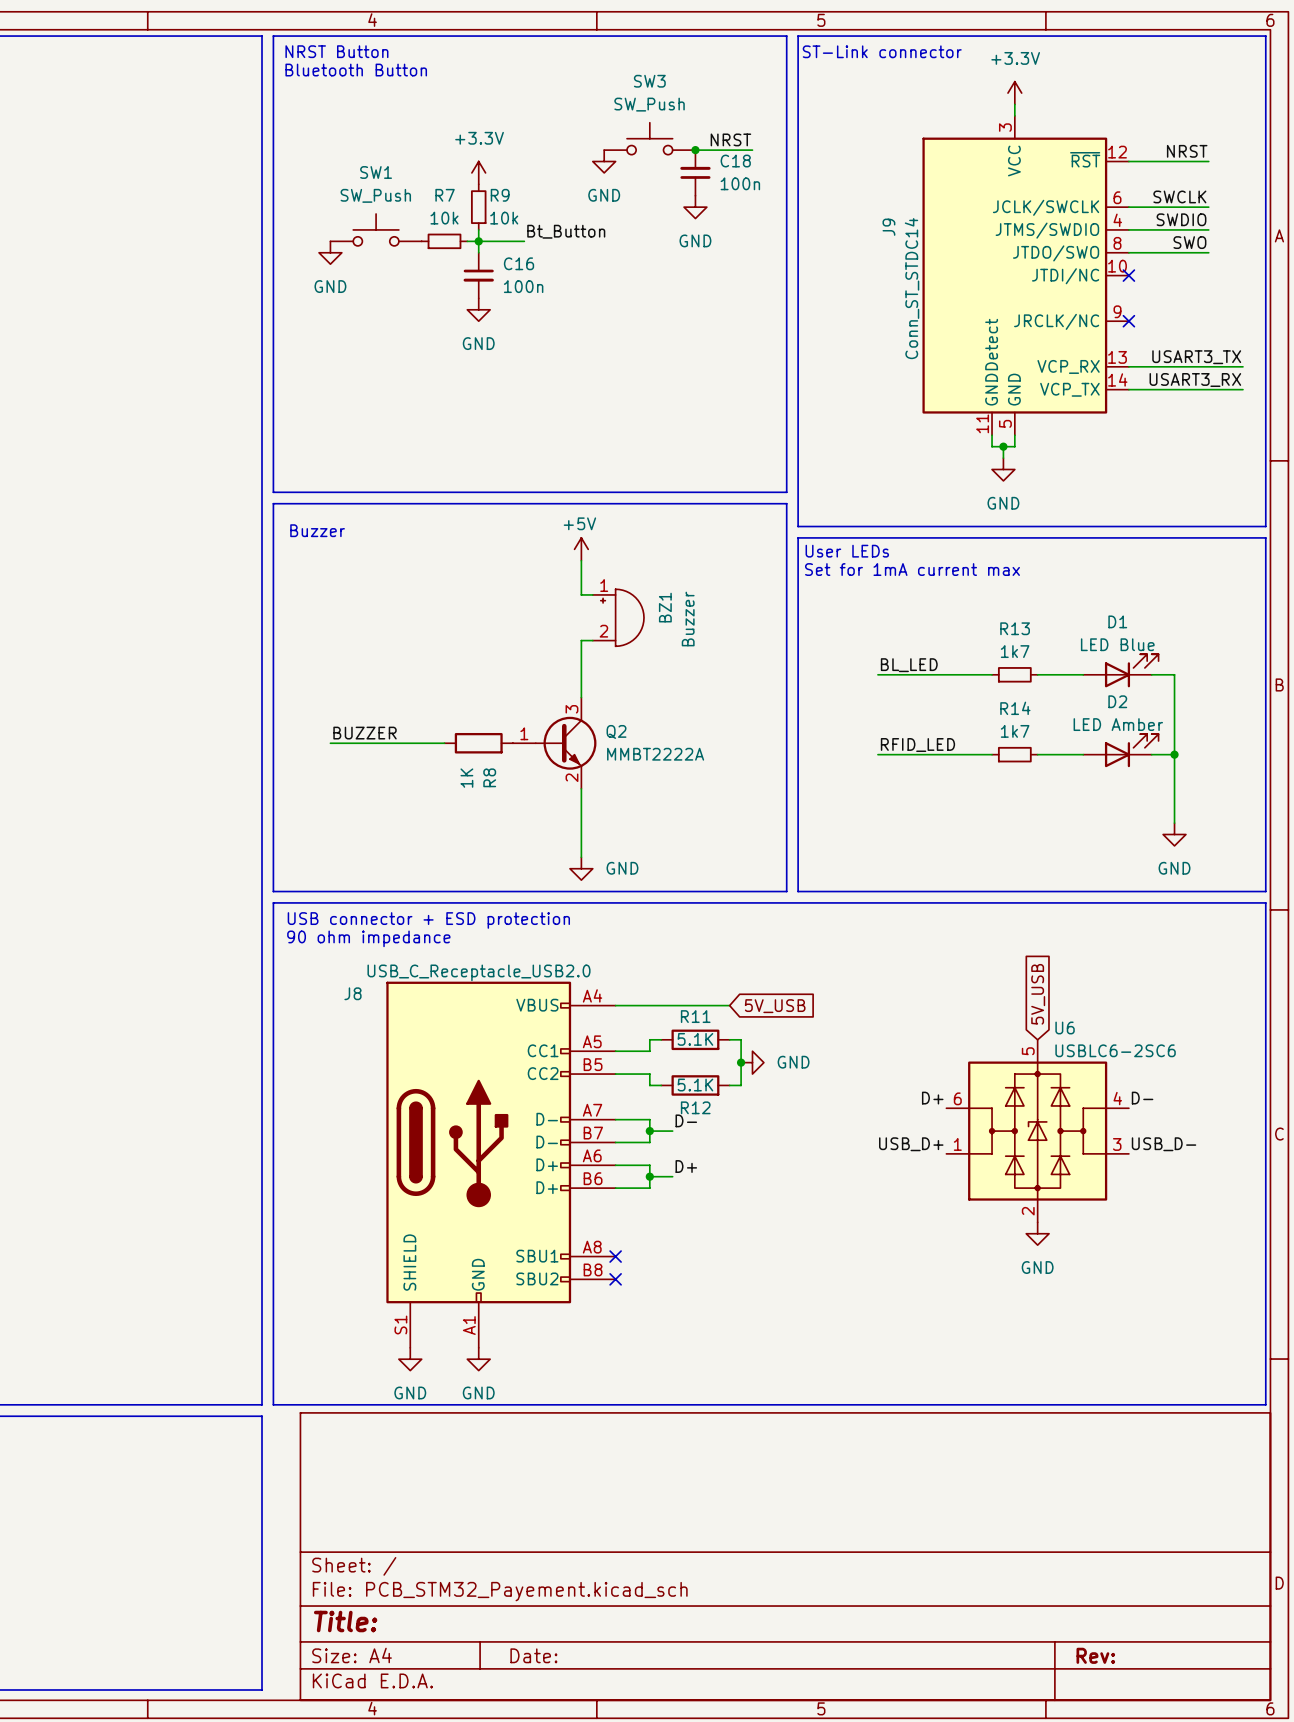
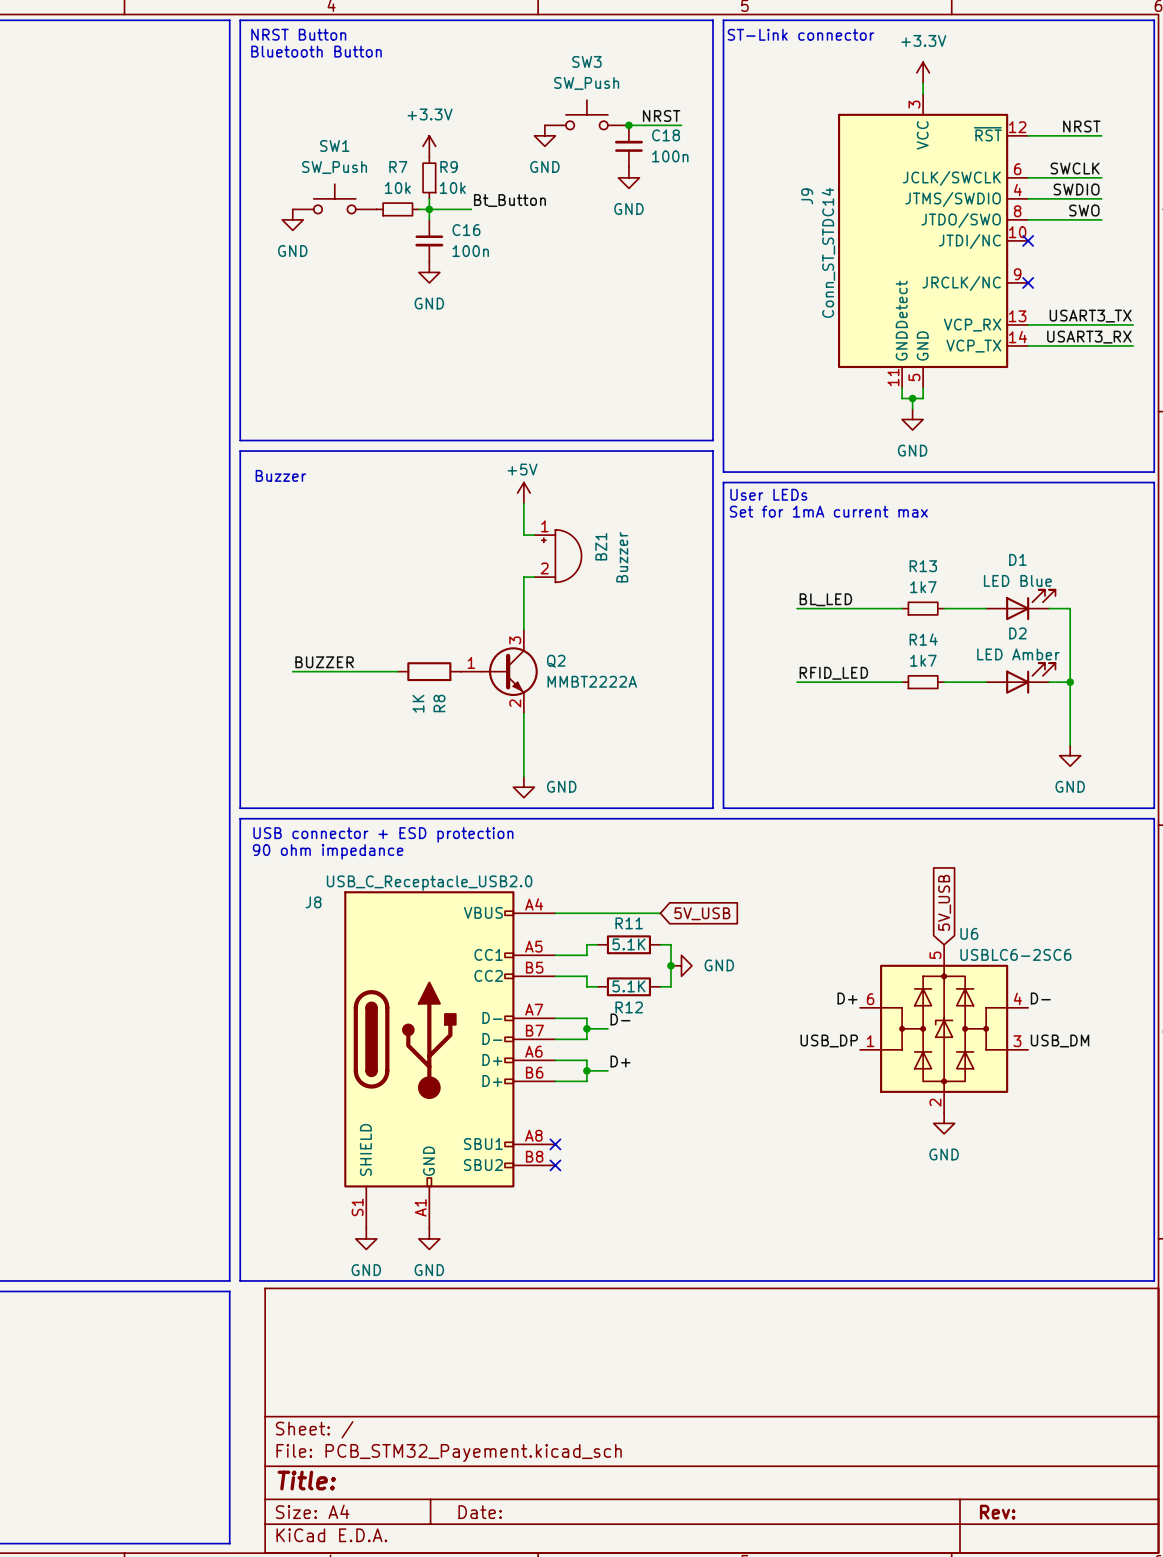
label: USB_D+ (911, 1144) -> USB_DP (829, 1040)
label: USB_D- (1164, 1144) -> USB_DM (1060, 1040)

